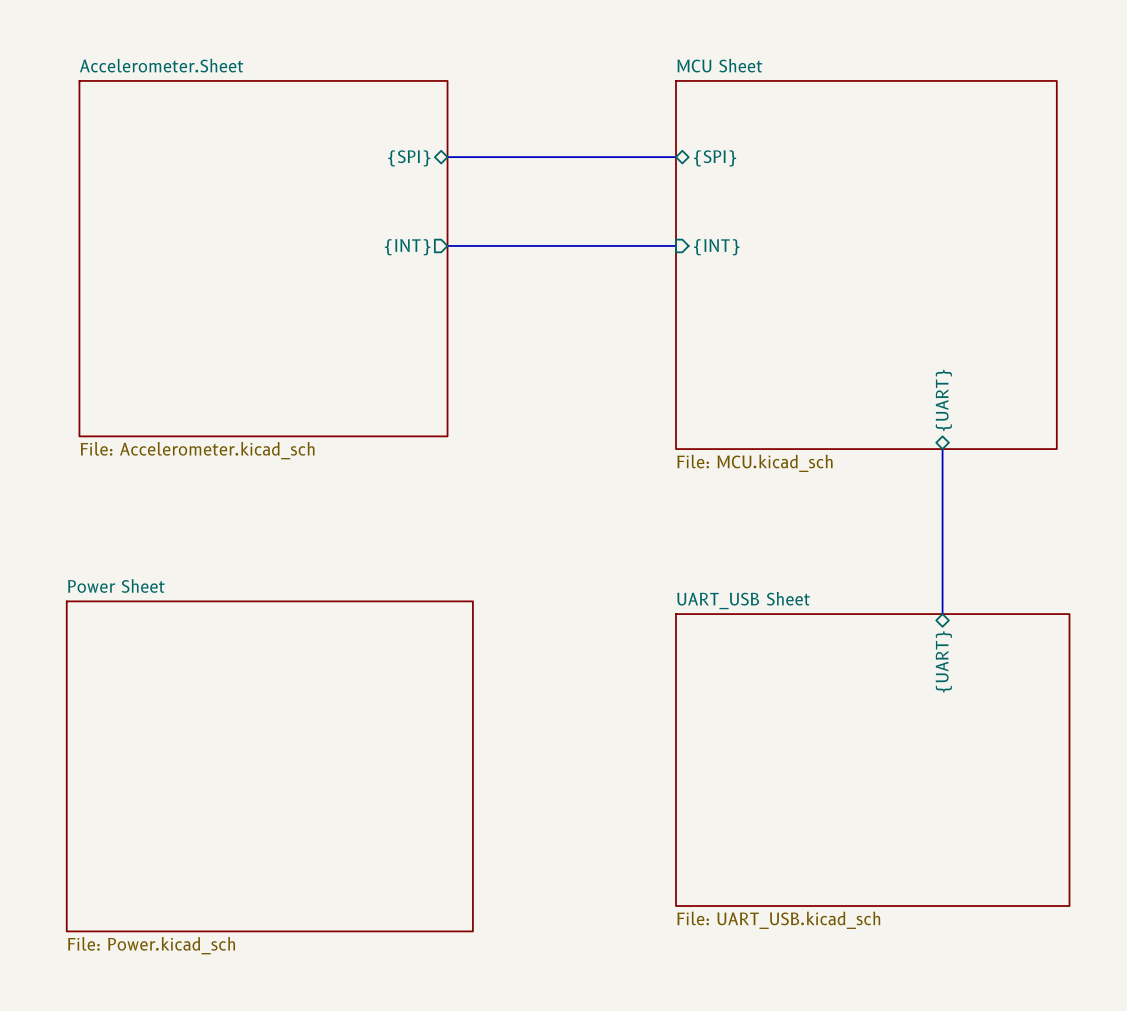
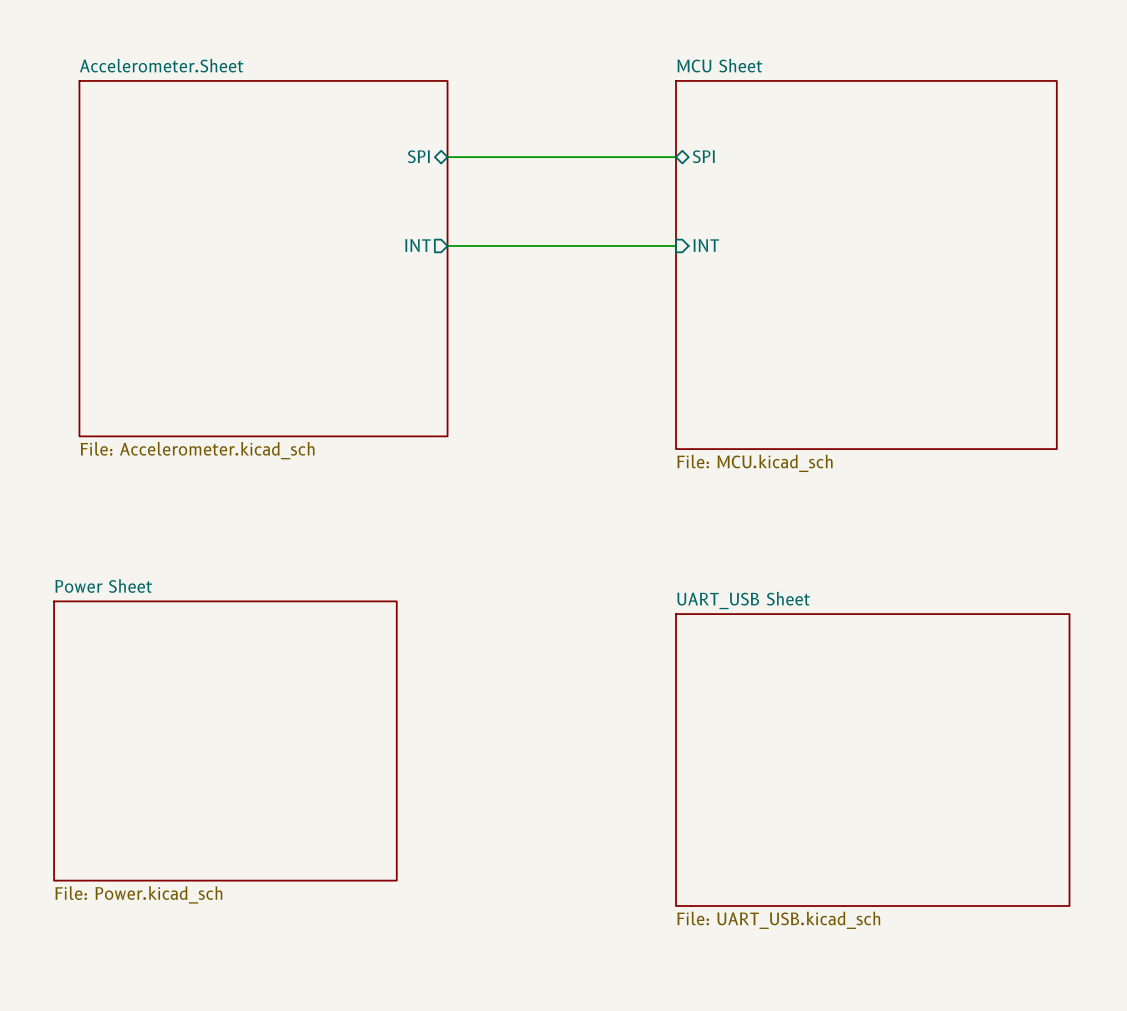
bus: (447, 157) (676, 157) -> none
sheet pin: {SPI} (409, 158) -> SPI (418, 156)
sheet pin: {SPI} (715, 158) -> SPI (703, 156)
bus: (447, 245) (676, 245) -> none
sheet pin: {INT} (407, 247) -> INT (417, 245)
sheet pin: {INT} (716, 247) -> INT (706, 245)
sheet pin: {UART} (943, 400) -> none
bus: (942, 449) (942, 614) -> none
sheet pin: {UART} (943, 661) -> none
sheet Power Sheet: none -> File: Power.kicad_sch (225, 741)
sheet Power Sheet: File: Power.kicad_sch (269, 766) -> none

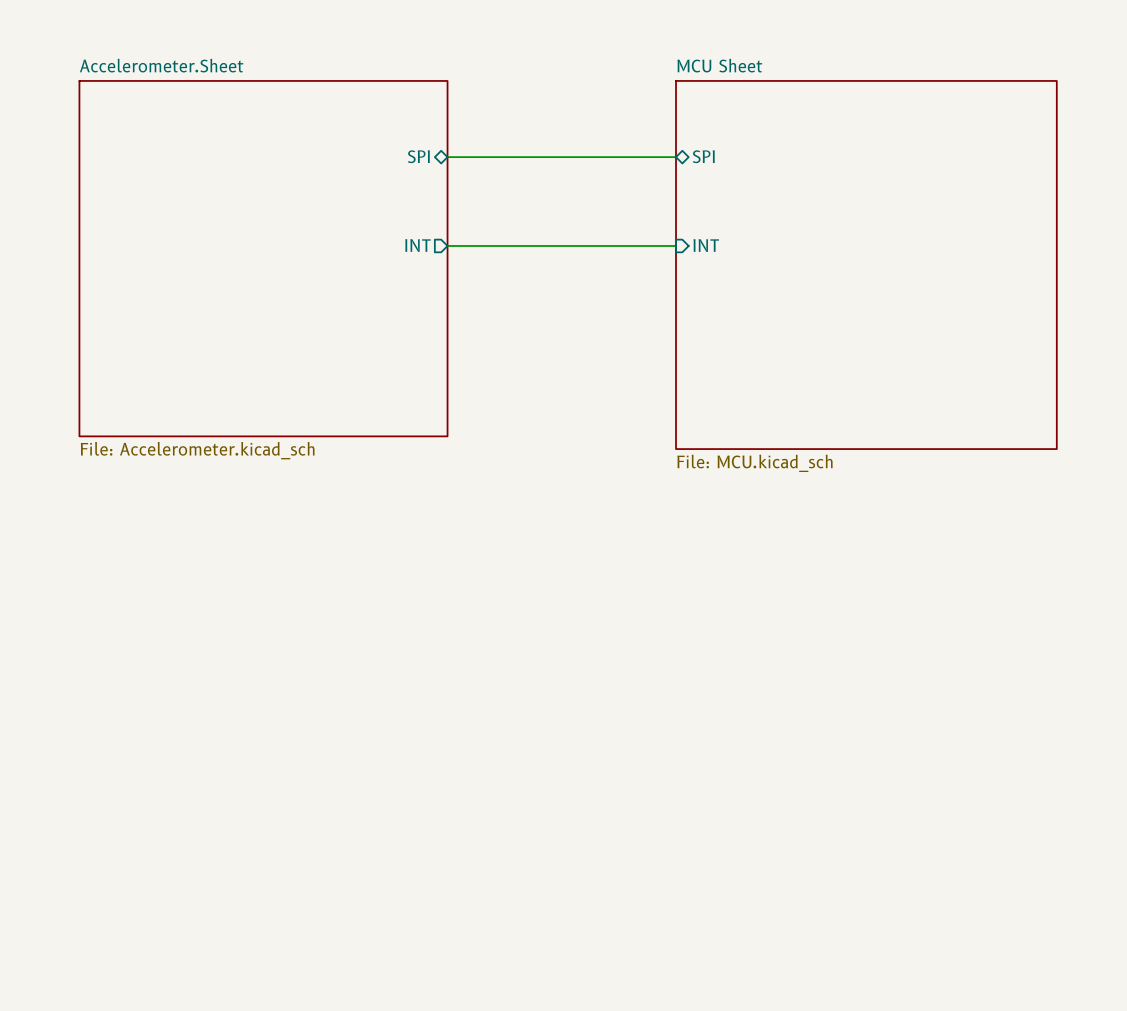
sheet Power Sheet: File: Power.kicad_sch (225, 741) -> none
sheet UART_USB Sheet: File: UART_USB.kicad_sch (872, 760) -> none

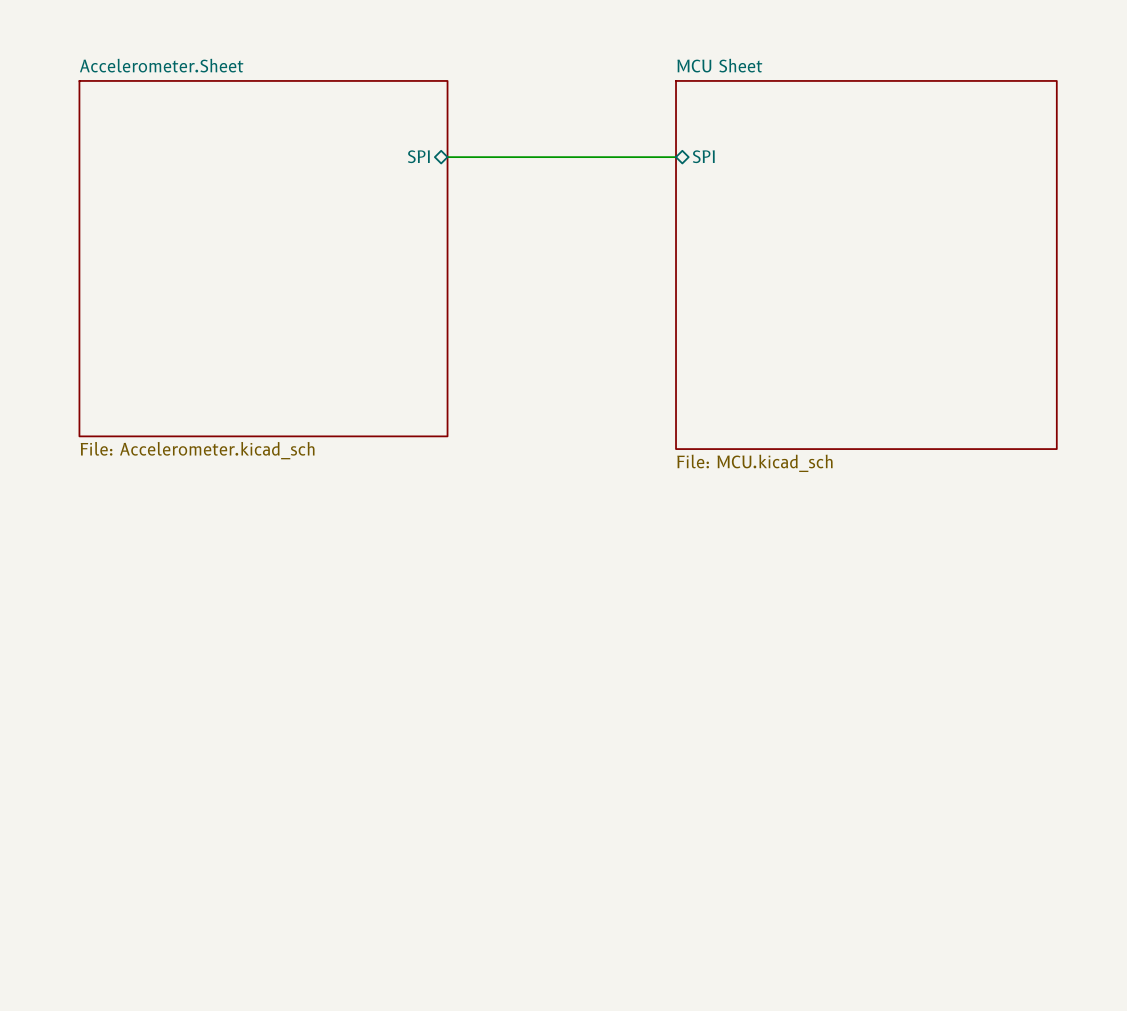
sheet pin: INT (417, 245) -> none
wire: (447, 245) (676, 245) -> none
sheet pin: INT (706, 245) -> none

